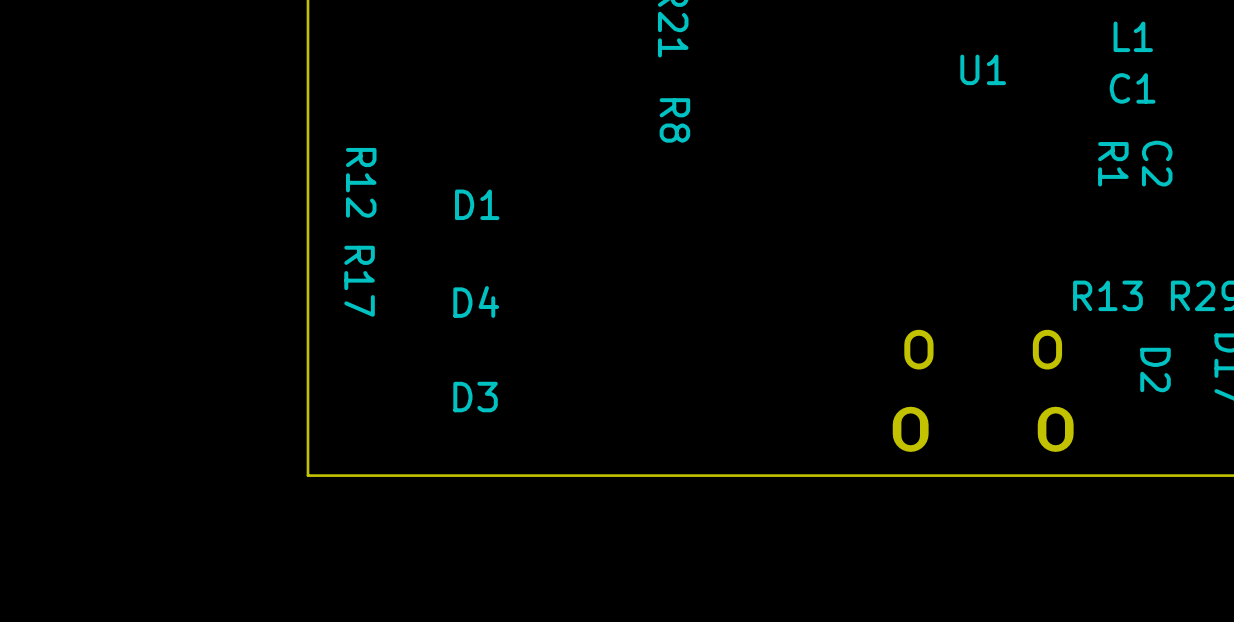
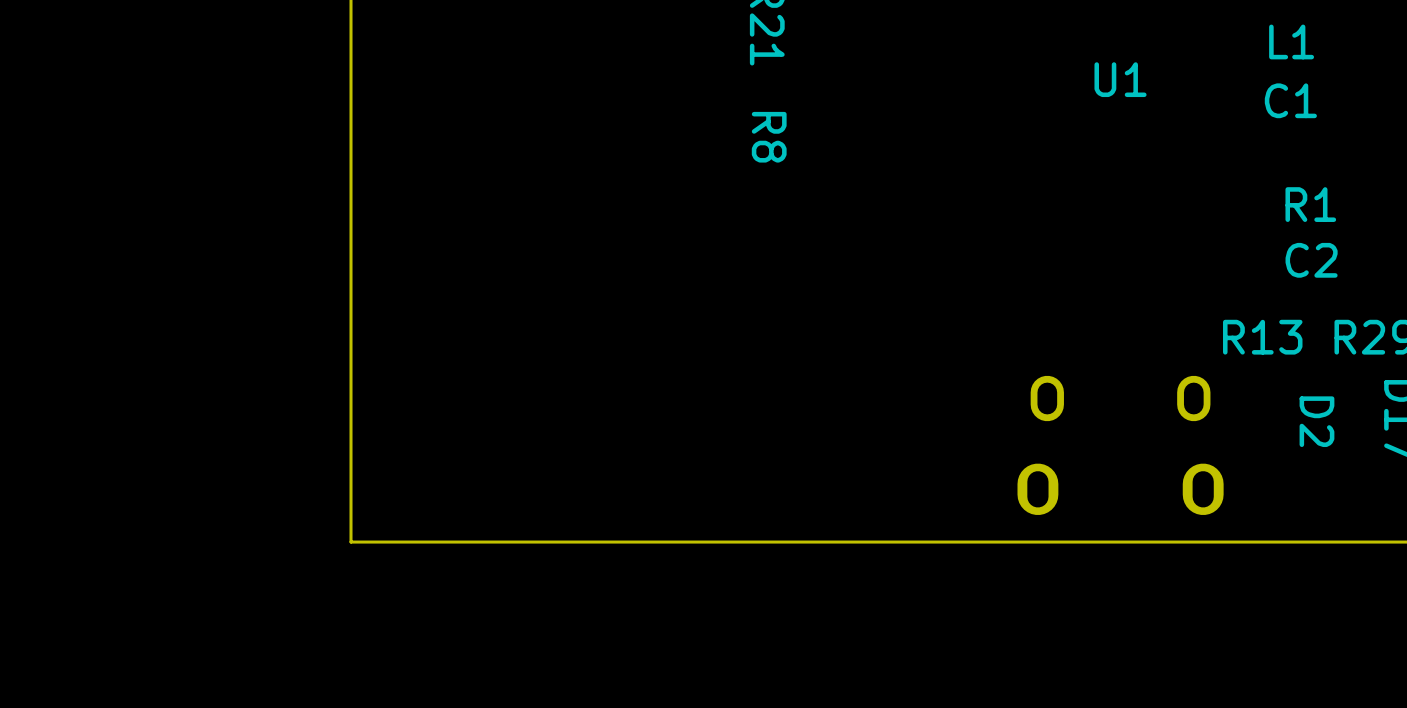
C2 position: (1157, 163) -> (1311, 260)
C2 name rotation: 0° (1157, 163) -> 90° counterclockwise (1311, 260)
R1 position: (1113, 164) -> (1310, 204)
R1 name rotation: 0° (1113, 164) -> 90° counterclockwise (1310, 204)
R12: (361, 182) -> none
D1: (477, 204) -> none
R17: (359, 281) -> none
D4: (476, 301) -> none
D3: (475, 397) -> none

